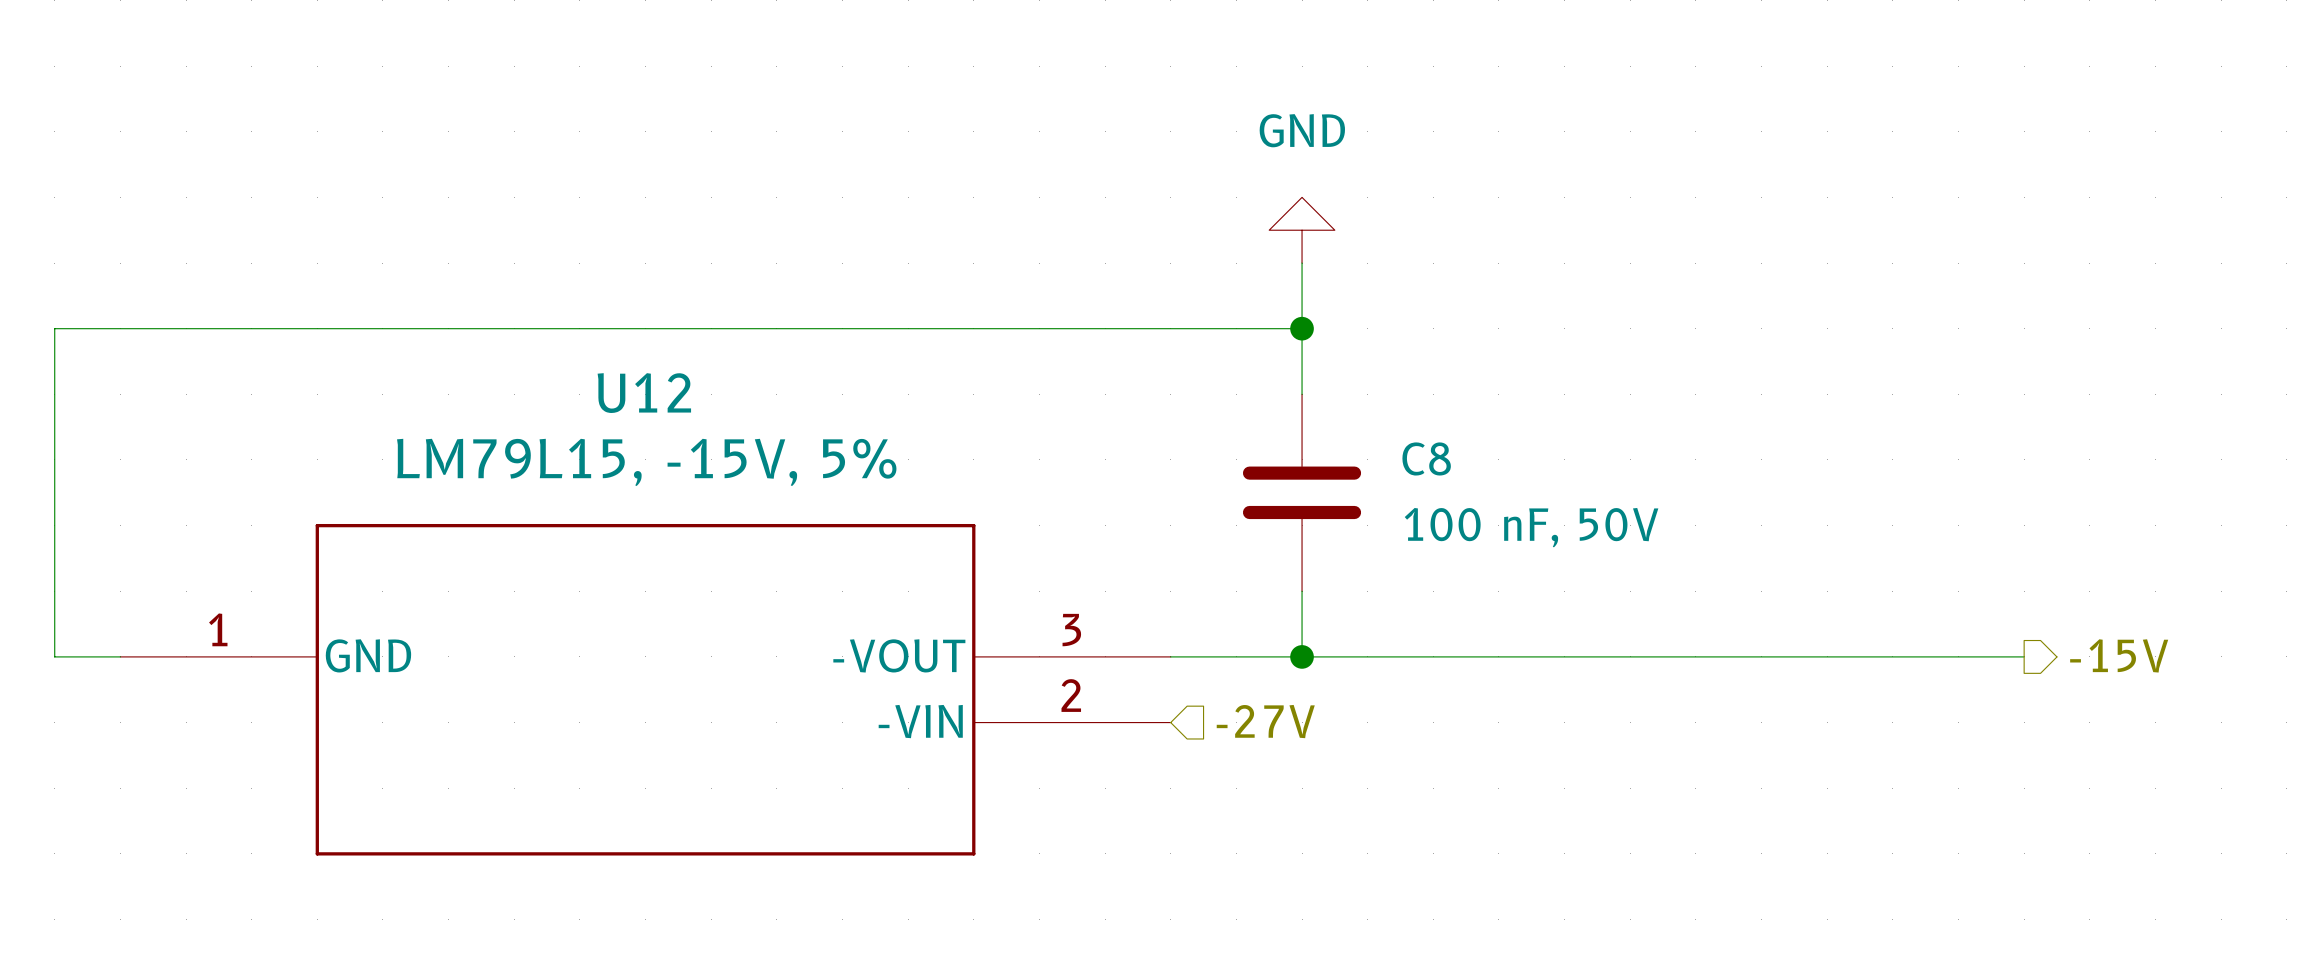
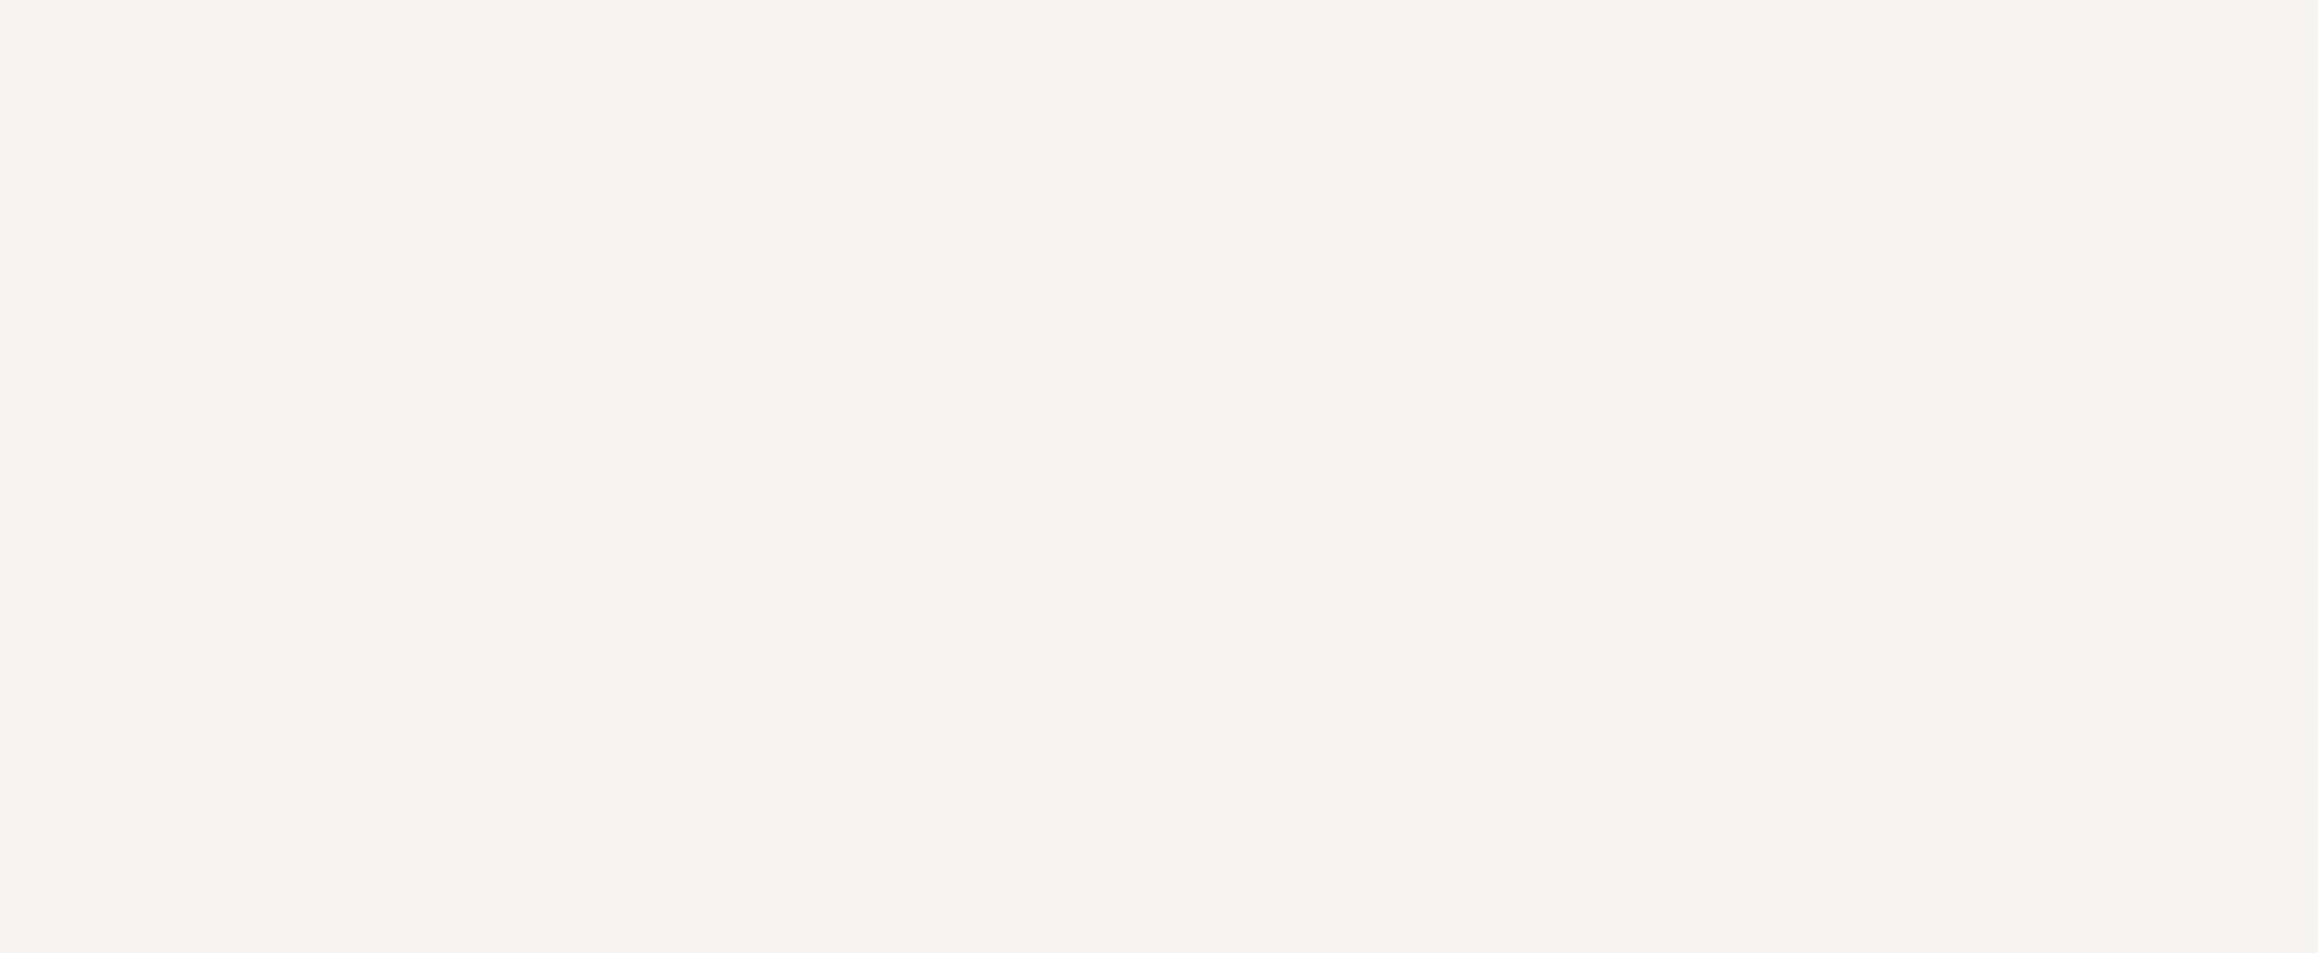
power symbol: GND (1302, 230) -> none
wire: (1302, 263) (1302, 394) -> none
wire: (1302, 328) (54, 328) (54, 656) (120, 656) -> none
junction: (1302, 328) -> none
C8: 100 nF, 50V (1302, 492) -> none
wire: (1302, 591) (1302, 656) -> none
hierarchical label: -15V (2119, 655) -> none
wire: (1170, 656) (2024, 656) -> none
junction: (1302, 656) -> none
U12: LM79L15, -15V, 5% (645, 689) -> none
hierarchical label: -27V (1265, 721) -> none

